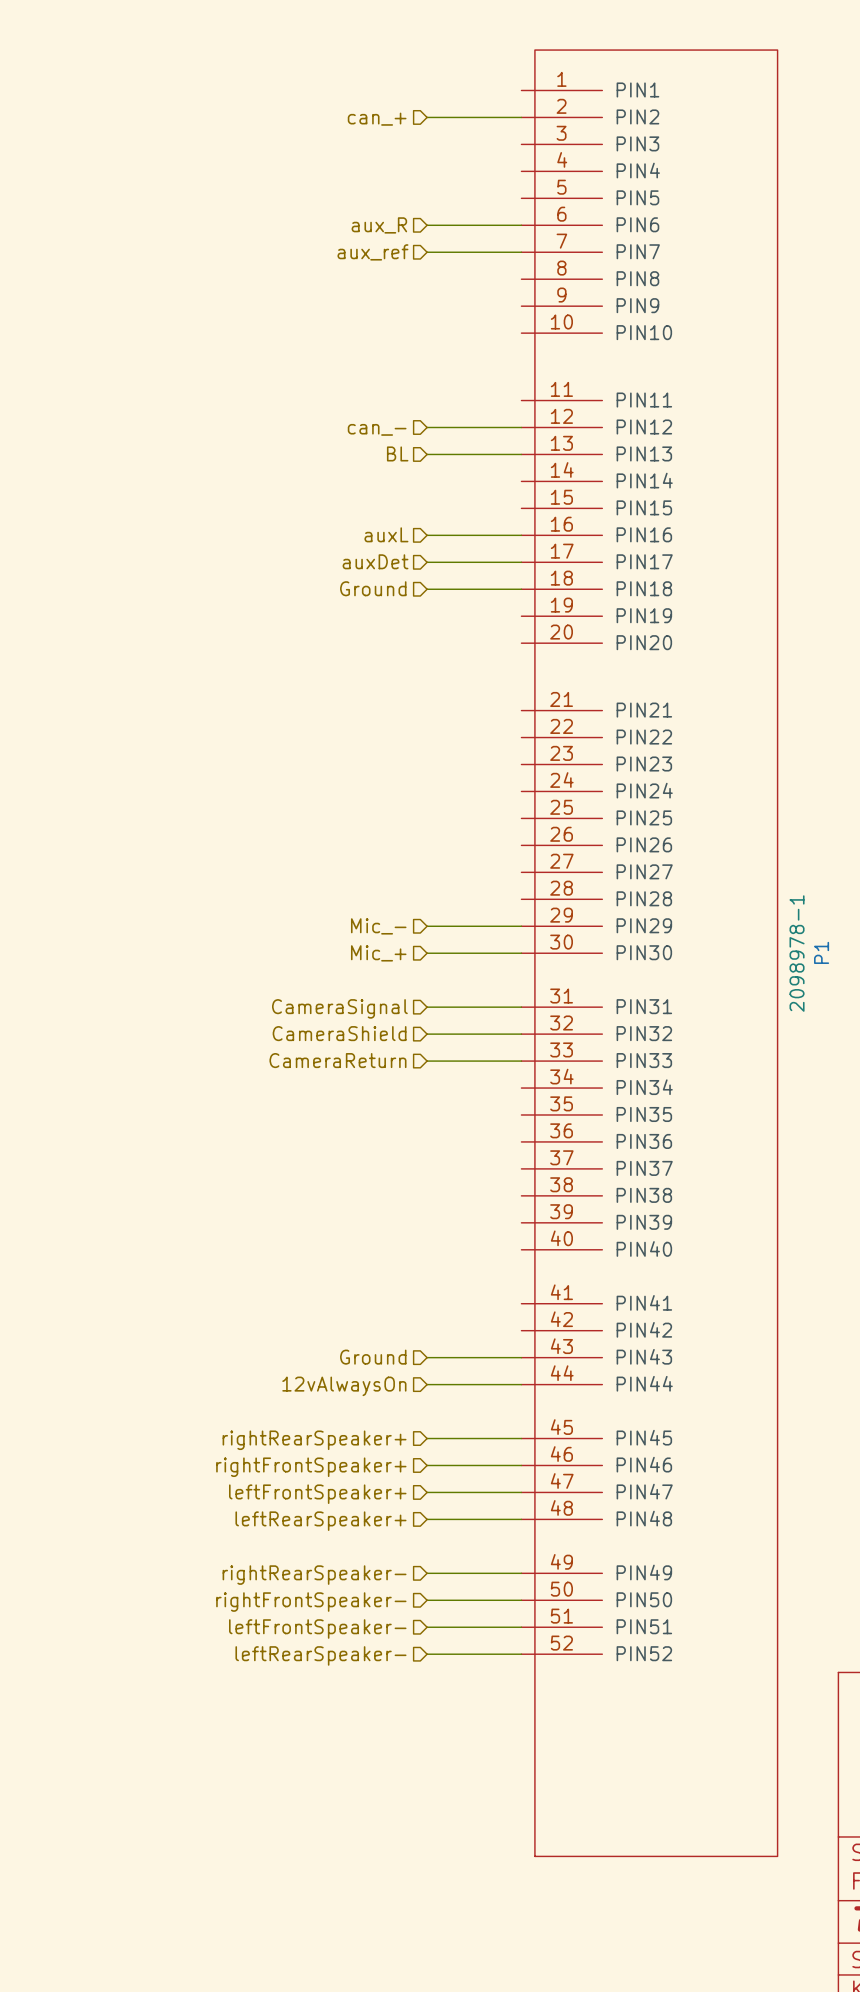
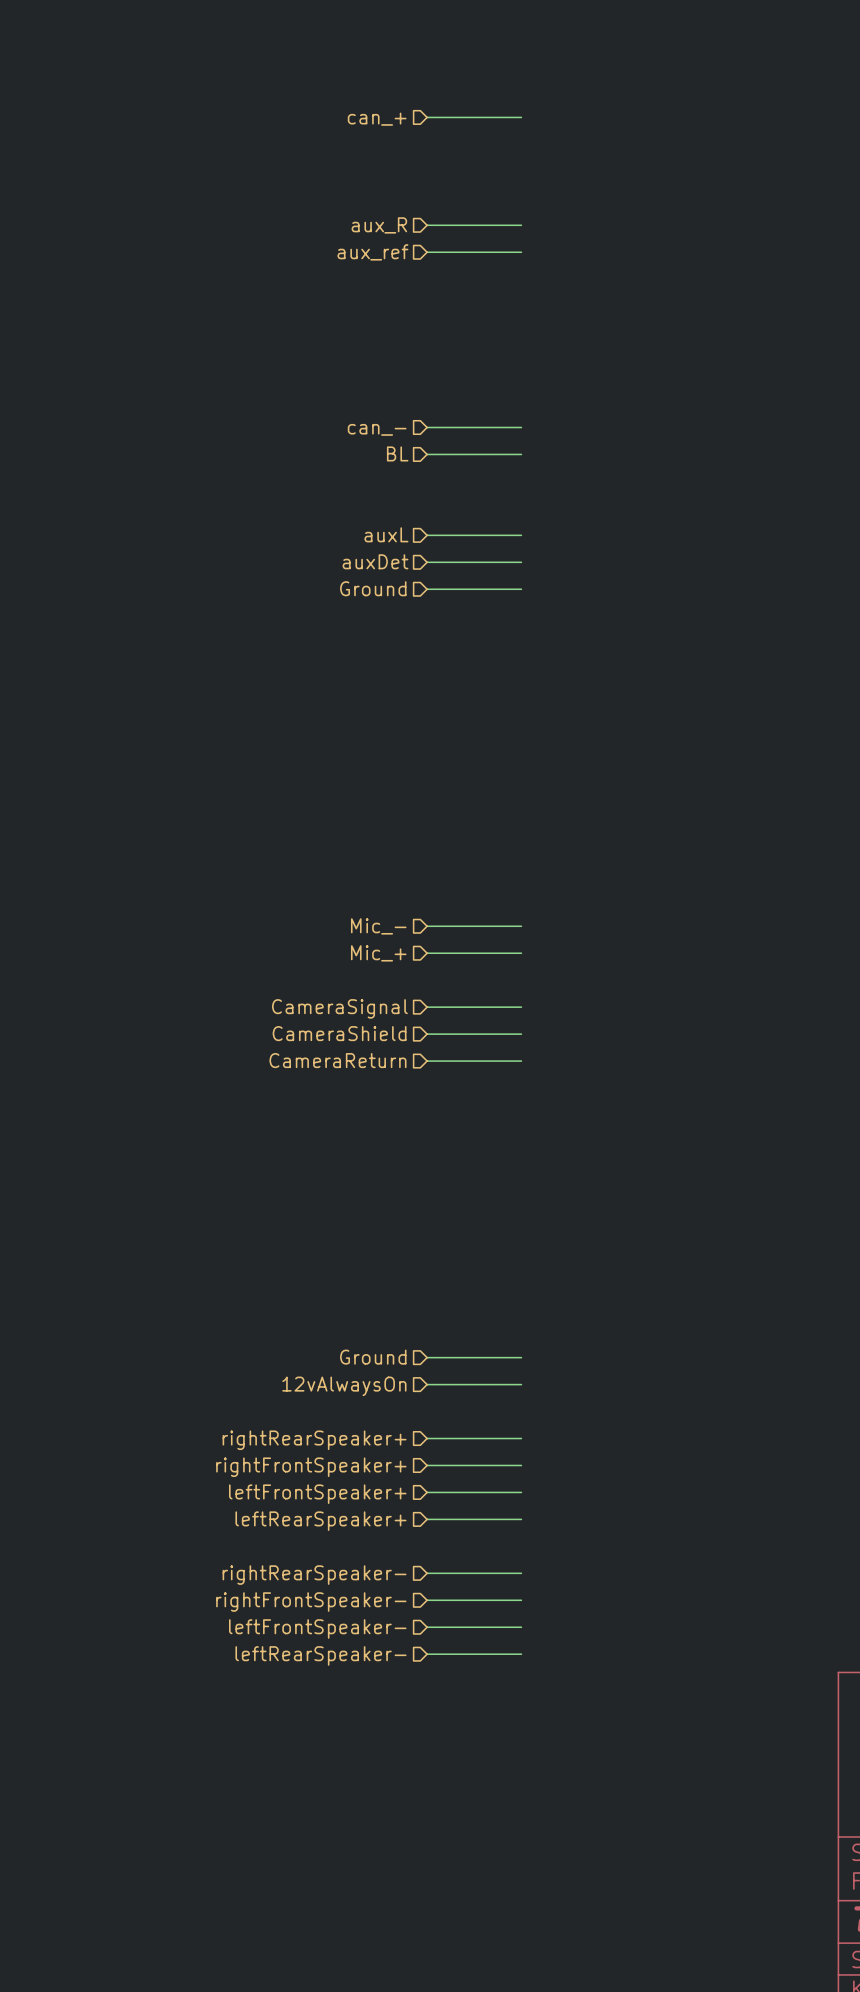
P1: 2098978-1 (649, 953) -> none

